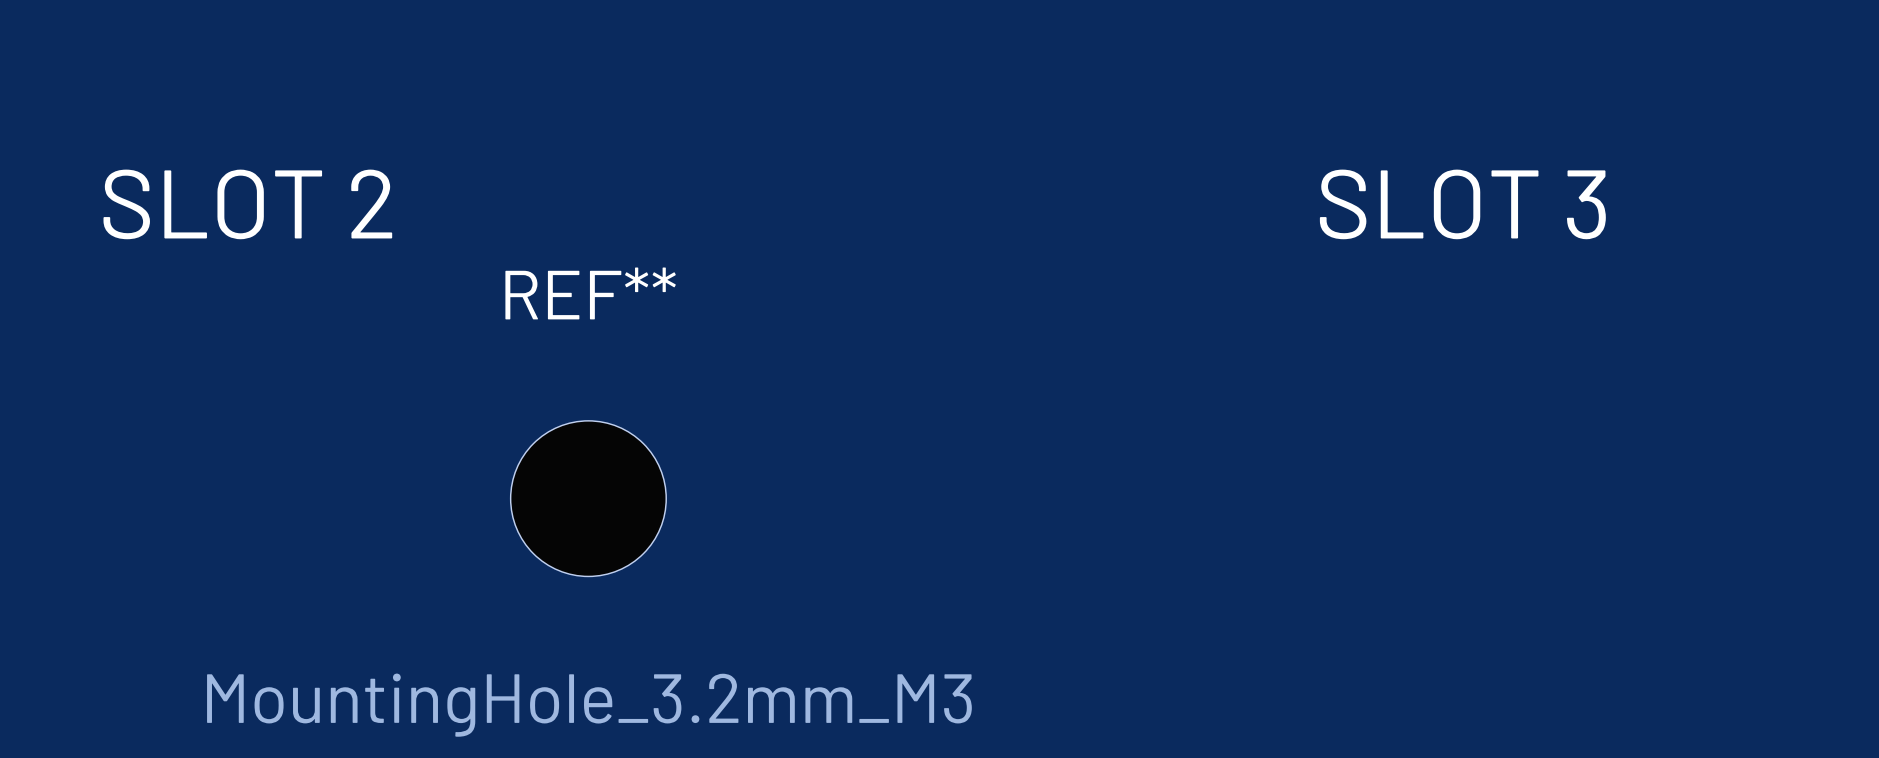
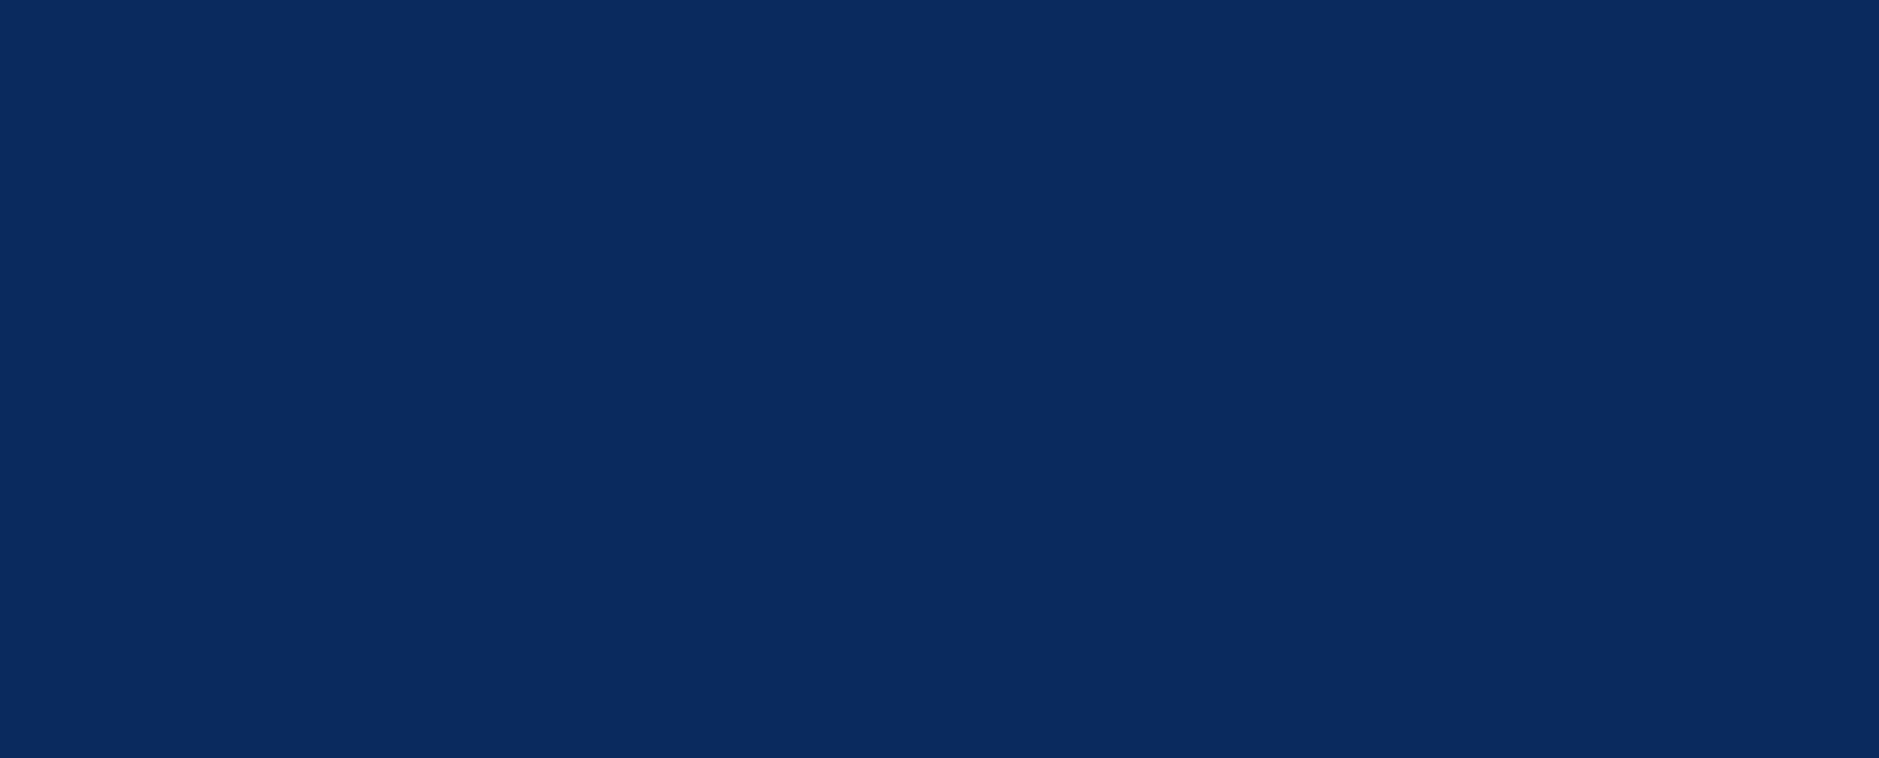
text: SLOT 2 (247, 204) -> none
text: SLOT 3 (1462, 204) -> none
REF**: MountingHole_3.2mm_M3 (588, 498) -> none

